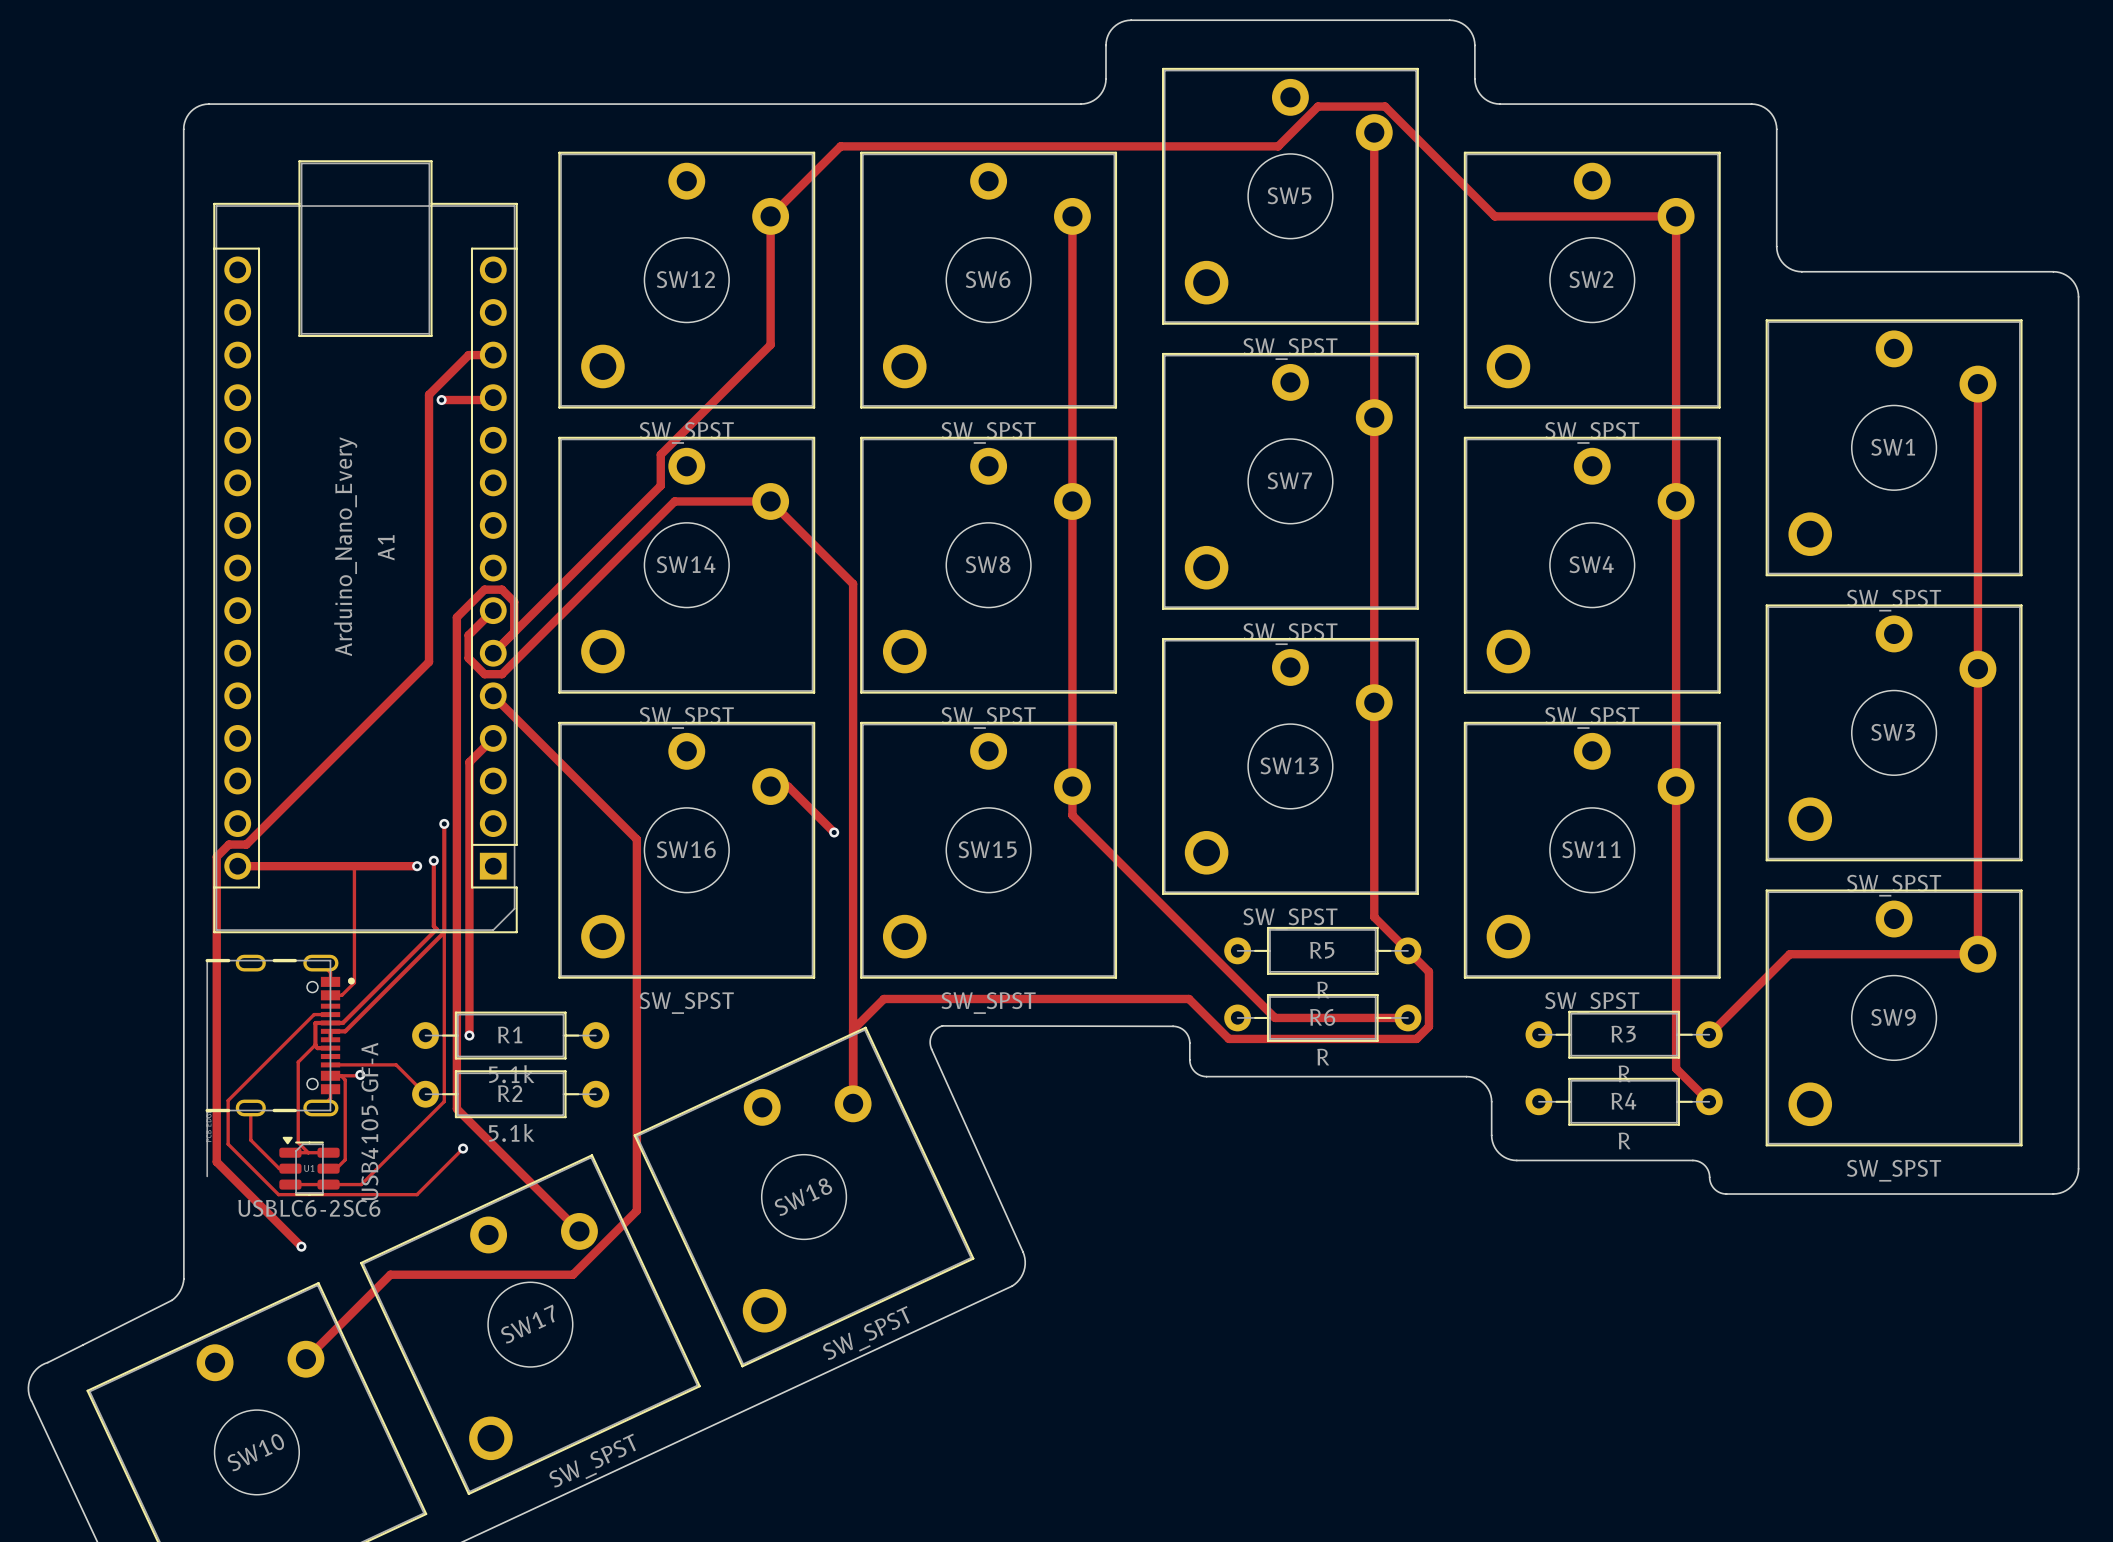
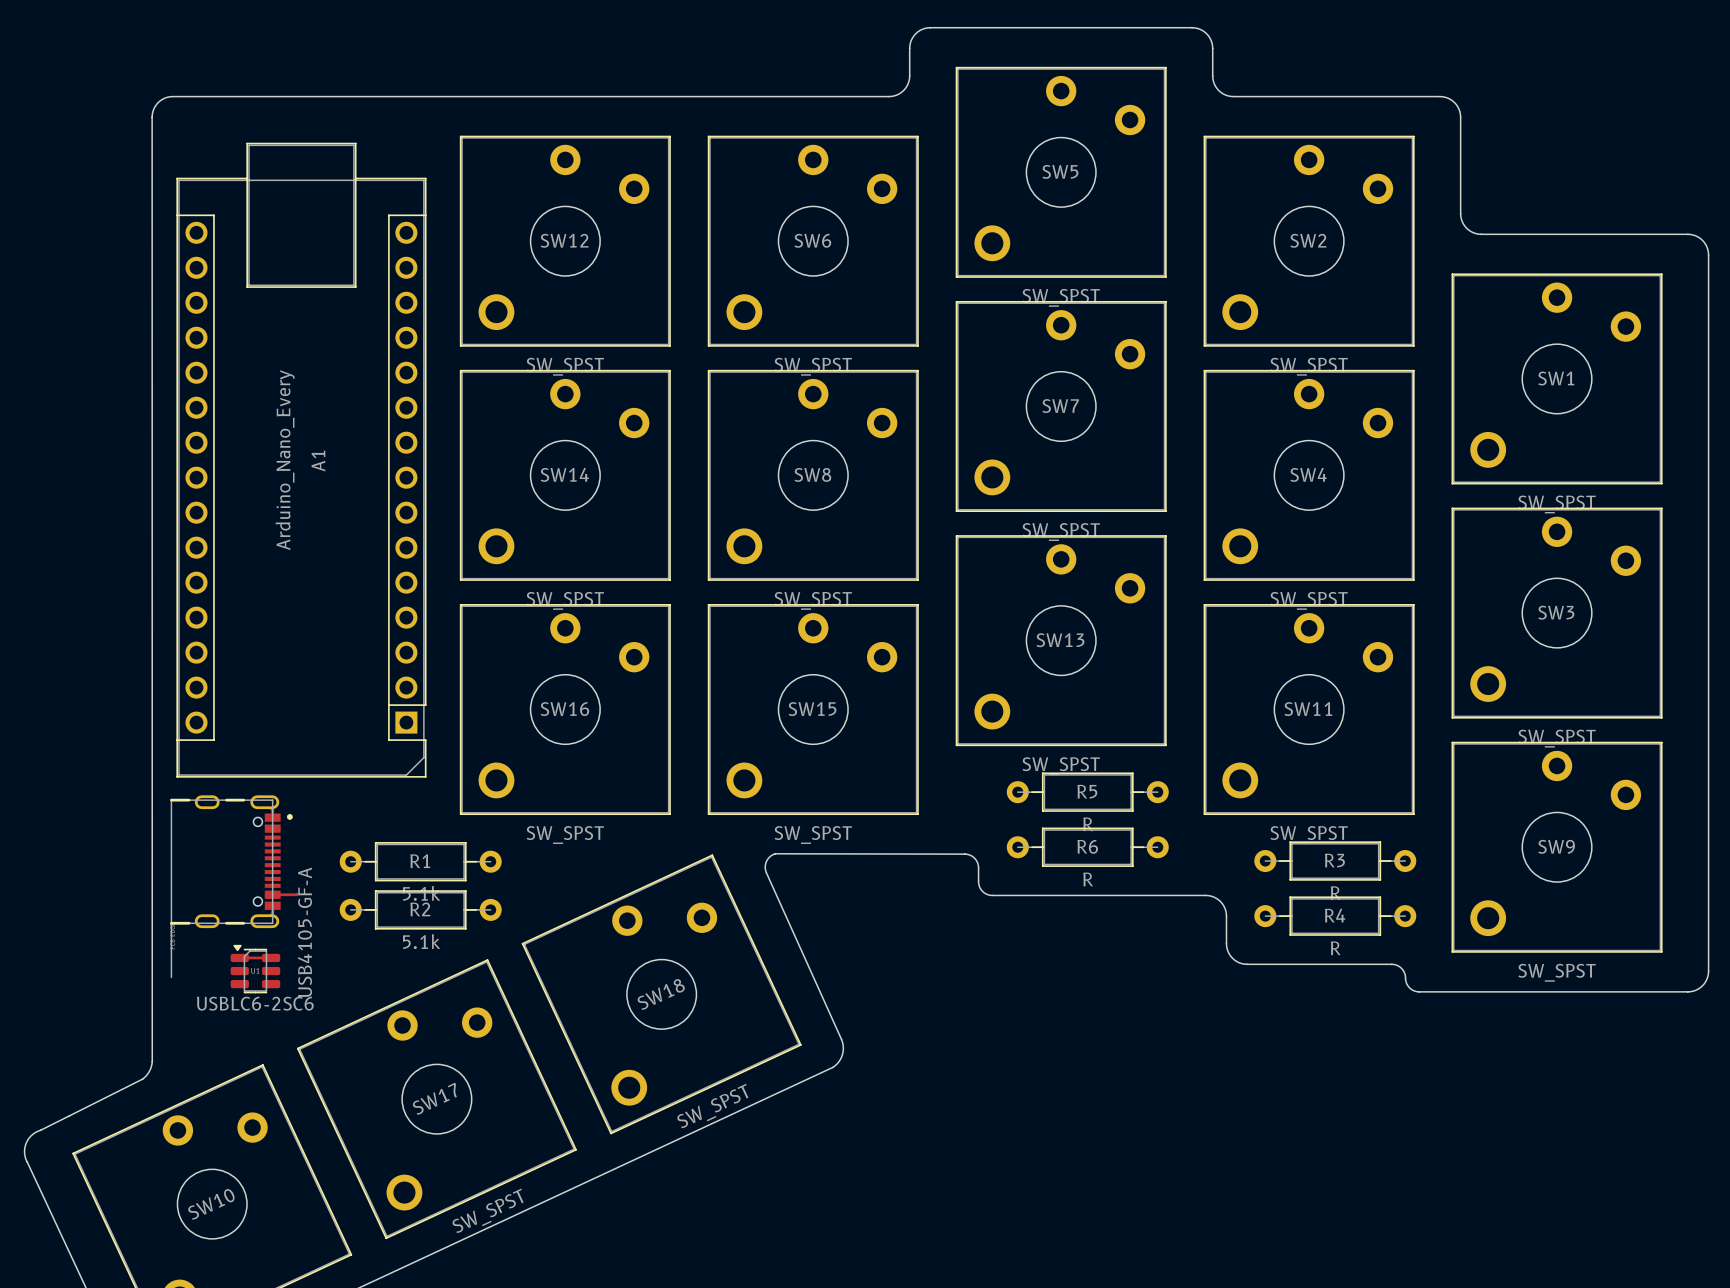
track: (1374, 132) (1374, 917) (1428, 971) (1428, 1026) (1416, 1038) (1228, 1038) (1189, 998) (883, 998) (853, 1029) -> none
track: (1072, 216) (1072, 815) (1275, 1017) (1407, 1017) -> none
track: (493, 355) (468, 355) (429, 394) (429, 661) (246, 844) (229, 844) (216, 856) (216, 1161) (301, 1246) -> none
track: (1977, 384) (1977, 954) (1789, 954) (1709, 1034) -> none
track: (493, 397) (490, 400) (441, 400) -> none
via: (441, 400) -> none
track: (493, 610) (468, 635) (468, 658) (484, 674) (501, 674) (674, 501) (770, 501) (853, 583) (853, 1103) -> none
track: (514, 632) (514, 601) (501, 589) (484, 589) (456, 617) (456, 1108) (579, 1231) -> none
track: (493, 653) (660, 485) (660, 454) (770, 344) (770, 216) (840, 146) (1278, 146) (1318, 106) (1385, 106) (1494, 216) (1676, 216) (1676, 1068) (1709, 1101) -> none
track: (493, 695) (636, 839) (636, 1210) (572, 1274) (390, 1274) (305, 1359) -> none
track: (493, 738) (469, 762) (469, 1035) -> none
track: (770, 786) (788, 786) (834, 832) -> none
track: (444, 823) (444, 932) -> none
via: (444, 823) -> none
via: (834, 832) -> none
track: (433, 860) (433, 926) (436, 929) (342, 1022) (315, 1023) (315, 1046) (317, 1048) (330, 1048) -> none
via: (433, 860) -> none
track: (237, 866) (417, 866) -> none
track: (353, 866) (354, 982) (341, 995) (330, 995) -> none
via: (417, 866) -> none
track: (444, 932) (444, 1101) (361, 1184) (290, 1184) -> none
track: (444, 932) (345, 1031) (330, 1031) (330, 1039) -> none
track: (330, 1014) (314, 1014) (228, 1100) (228, 1144) (278, 1194) (417, 1194) (463, 1148) -> none
via: (469, 1035) -> none
track: (315, 1044) (298, 1062) (298, 1142) (308, 1152) -> none
track: (330, 1064) (396, 1064) (425, 1094) -> none
via: (360, 1074) -> none
track: (341, 1075) (345, 1080) (345, 1159) (336, 1168) (328, 1168) -> none
track: (250, 1107) (250, 1140) (279, 1168) (290, 1168) -> none
via: (463, 1148) -> none
via: (301, 1246) -> none

